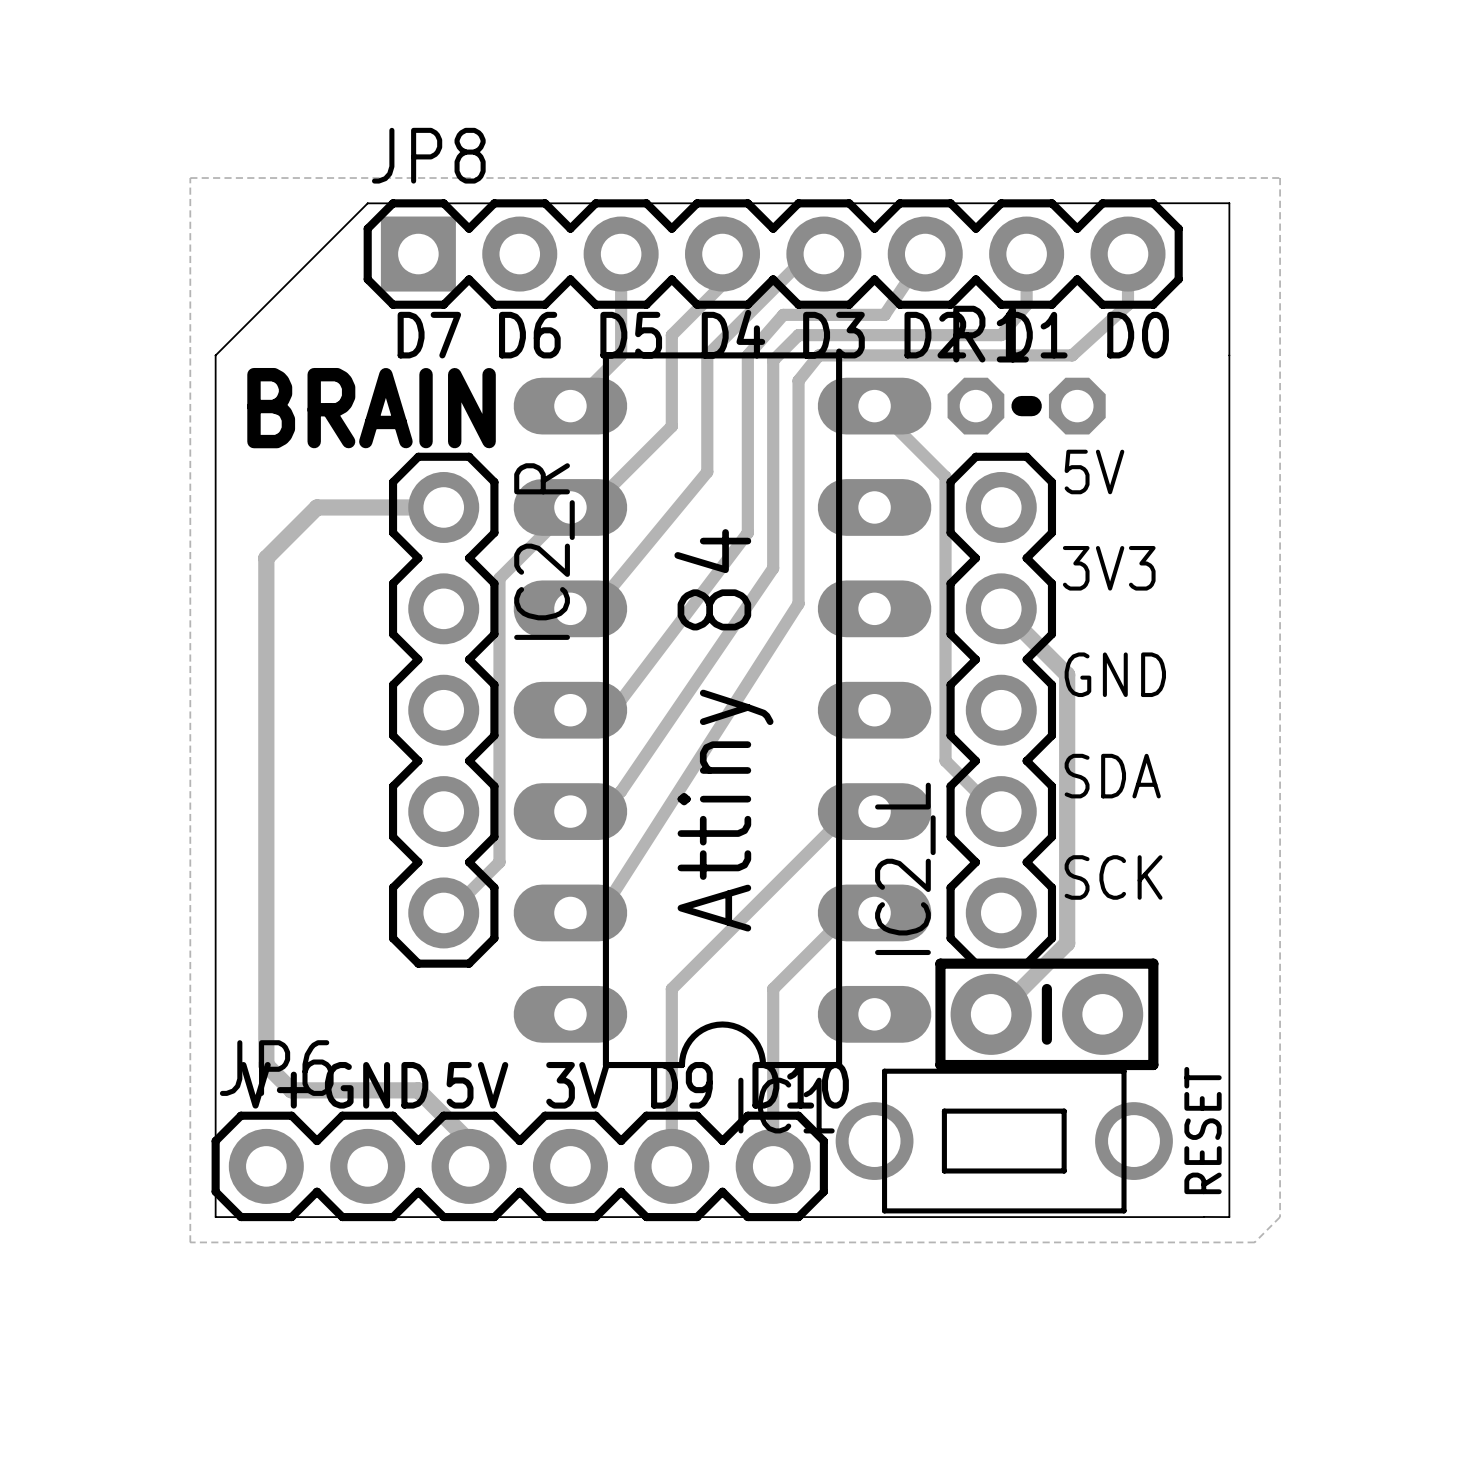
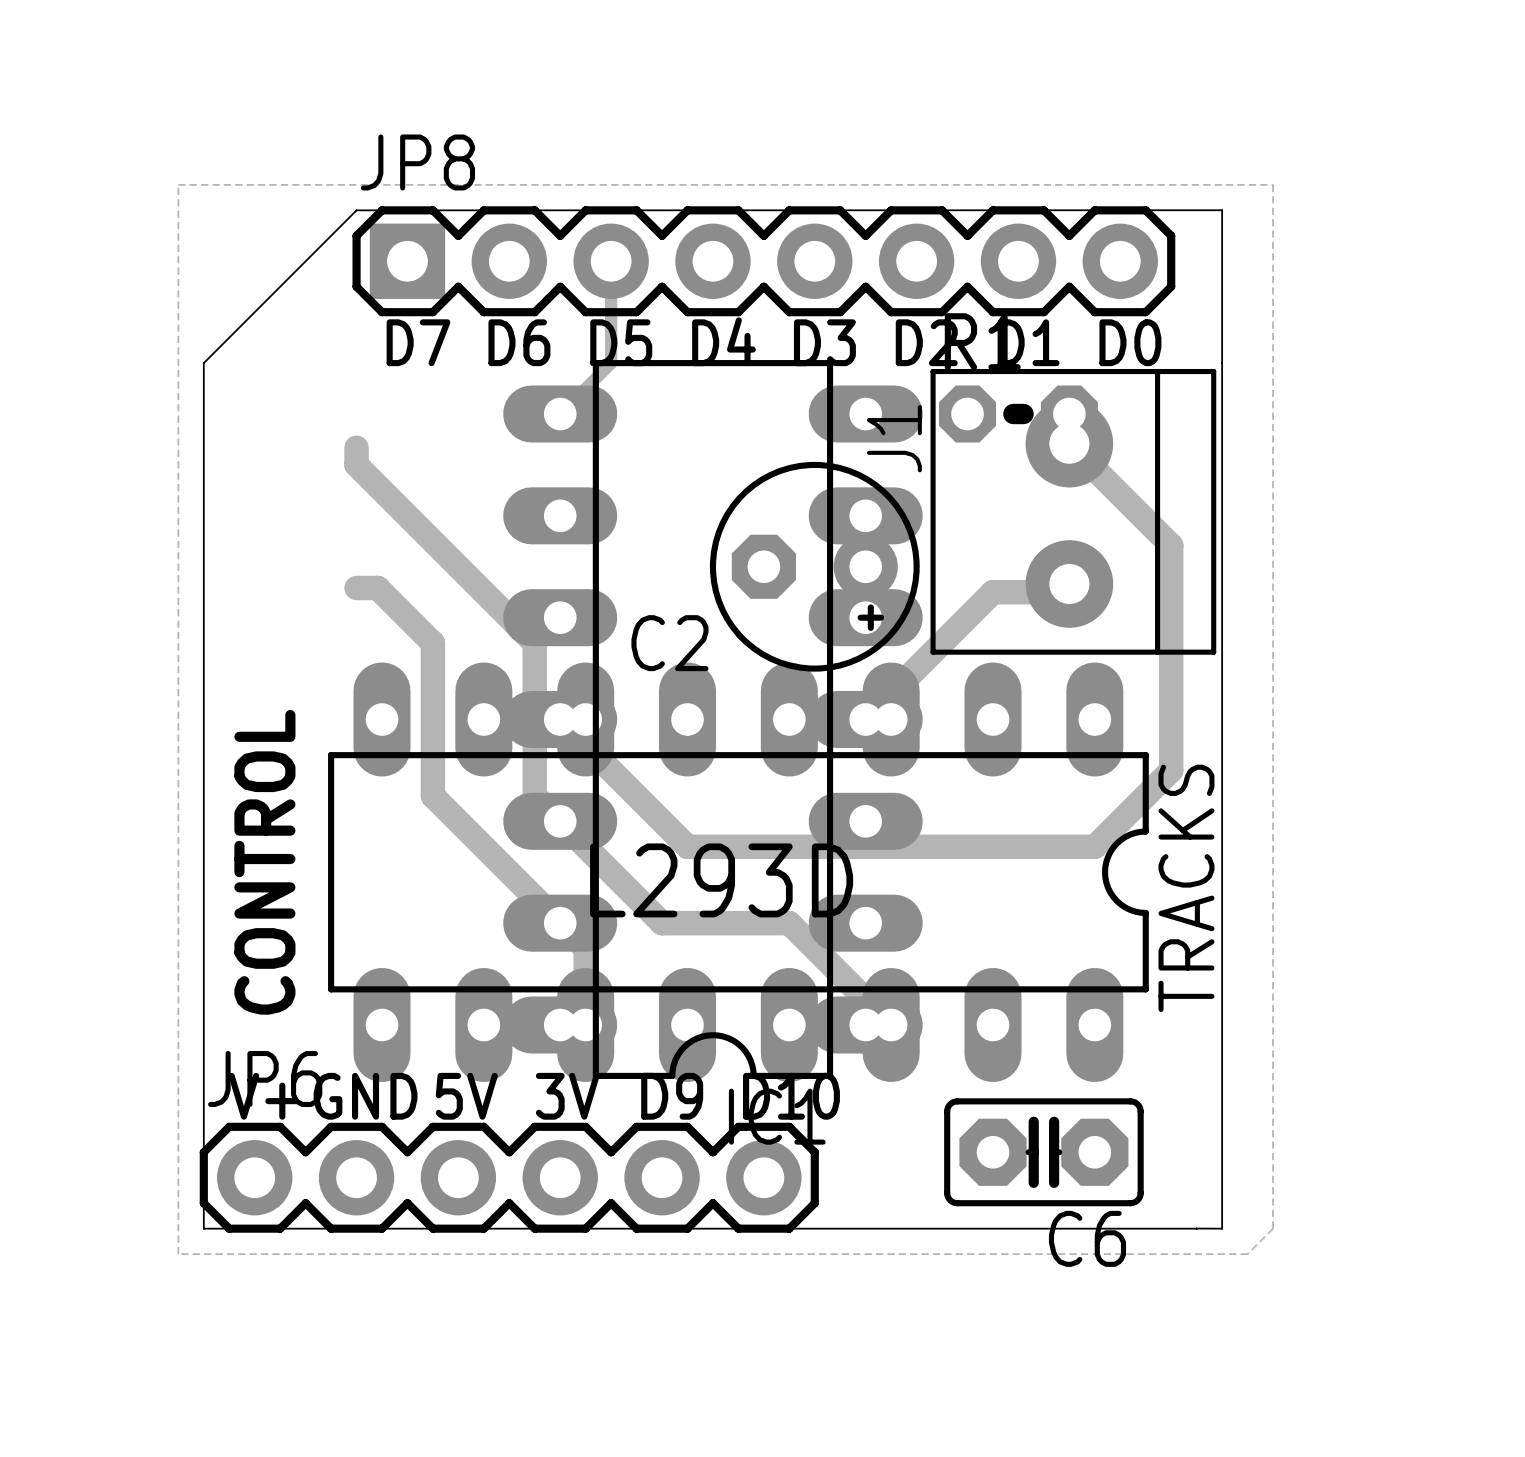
track: (722, 254) (722, 284) (671, 335) (671, 426) (590, 507) (570, 507) (499, 578) (499, 862) (448, 912) (443, 912) -> none
track: (823, 254) (808, 254) (707, 355) (707, 471) (611, 588) (590, 608) (570, 608) -> none
track: (925, 254) (884, 314) (783, 314) (747, 355) (747, 532) (621, 700) (611, 710) (570, 710) -> none
track: (1026, 254) (1026, 304) (1001, 335) (798, 335) (773, 360) (773, 568) (621, 791) (600, 811) (570, 811) -> none
track: (1128, 254) (1128, 304) (1072, 355) (818, 355) (798, 380) (798, 603) (600, 912) (570, 912) -> none
track: (874, 406) (945, 477) (945, 760) (996, 811) (1001, 811) -> none
text: BRAIN (371, 408) -> none
track: none -> (1069, 443) (1171, 545) (1171, 770) (1094, 846) (687, 846) (585, 744) (585, 719)
track: none -> (356, 447) (356, 464) (534, 643) (534, 795) (662, 923) (789, 923) (891, 1025)
text: 5V (1094, 471) -> none
J1: none -> (1073, 511)
track: (443, 507) (317, 507) (266, 558) (266, 1065) (291, 1090) (418, 1090) (469, 1141) (469, 1166) -> none
C2: none -> (814, 566)
text: 3V3 (1109, 568) -> none
track: none -> (1069, 584) (1061, 592) (993, 592) (891, 694) (891, 719)
track: none -> (356, 588) (377, 588) (432, 643) (432, 795) (585, 948) (585, 1025)
track: (1001, 608) (1067, 674) (1067, 943) (996, 1014) (991, 1014) -> none
text: GND (1115, 674) -> none
IC2_R: (443, 710) -> none
IC2_L: (1001, 710) -> none
text: Attiny 84 (723, 730) -> none
text: SDA (1112, 776) -> none
track: (874, 811) (849, 811) (671, 988) (671, 1166) -> none
text: none -> CONTROL (264, 862)
TRACKS: none -> (738, 872)
text: none -> L293D (721, 880)
text: SCK (1113, 877) -> none
track: (874, 912) (849, 912) (773, 988) (773, 1166) -> none
part: (1046, 1014) -> none
text: RESET (1203, 1130) -> none
part: (1004, 1141) -> none
C6: none -> (1043, 1152)

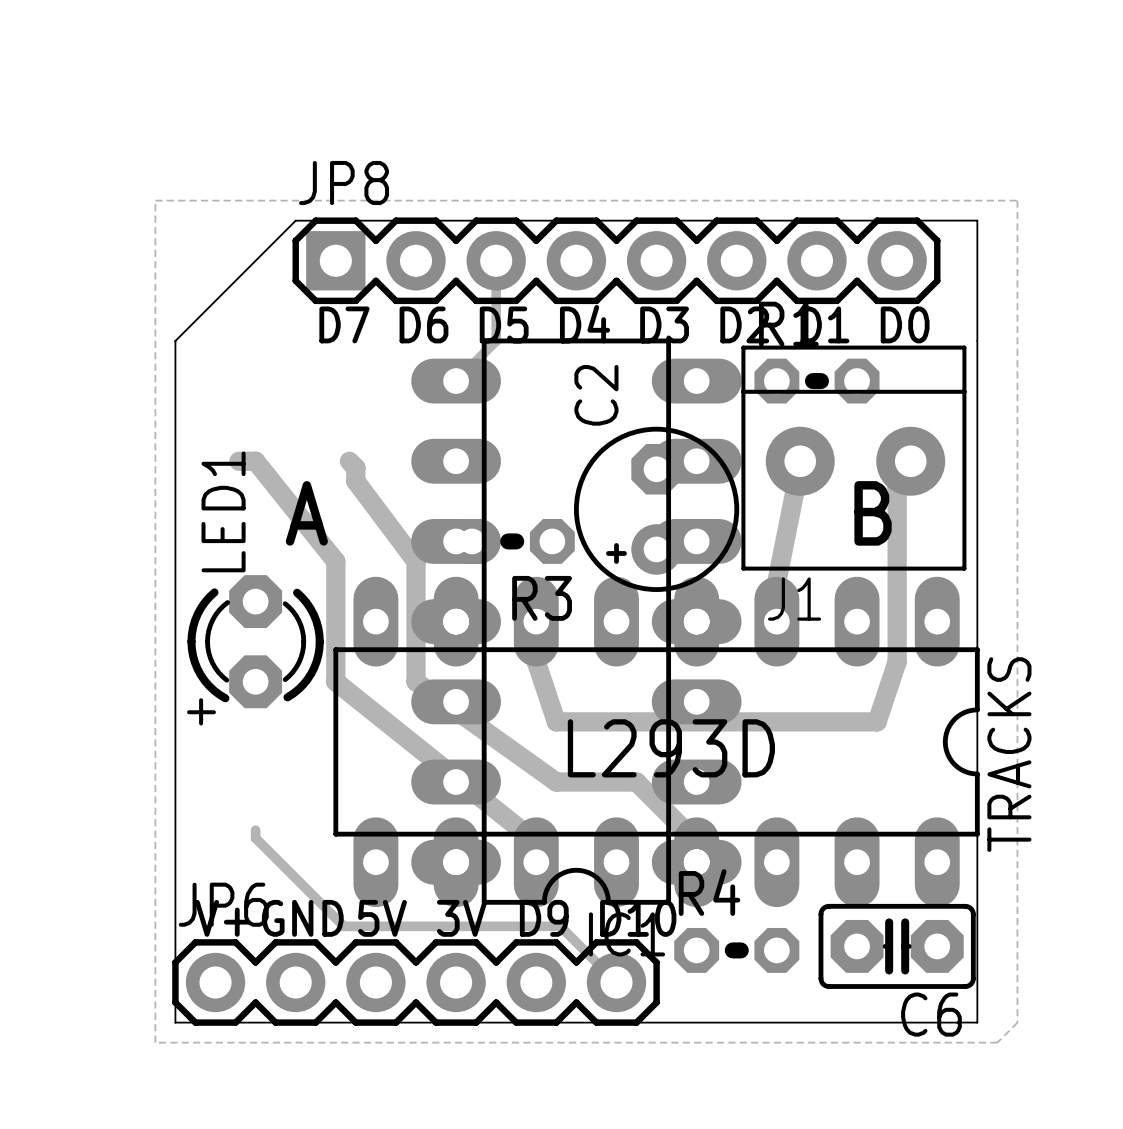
track: (1069, 443) (1171, 545) (1171, 770) (1094, 846) -> (910, 461) (897, 487) (897, 661) (877, 721)
track: (356, 447) (356, 464) (534, 643) (534, 795) (662, 923) (687, 923) -> (349, 461) (355, 467) (355, 481) (416, 561) (416, 681) (556, 782)
J1 rotation: 0° (1073, 511) -> 90° counterclockwise (853, 458)
track: none -> (238, 461) (255, 461) (335, 561) (335, 681) (536, 842) (536, 862)
track: none -> (800, 461) (796, 464) (796, 481) (776, 581) (776, 621)
C2 rotation: 0° (814, 566) -> 90° clockwise (656, 509)
text: none -> A (306, 513)
text: none -> B (873, 513)
track: (1069, 584) (1061, 592) (993, 592) (891, 694) (891, 719) -> none
track: (356, 588) (377, 588) (432, 643) (432, 795) (585, 948) (585, 1025) -> none
R3: none -> (512, 541)
track: (585, 719) (585, 744) (687, 846) -> (536, 621) (536, 661) (556, 721)
LED1: none -> (255, 650)
text: CONTROL (264, 862) -> none
TRACKS position: (738, 872) -> (656, 741)
text position: L293D (721, 880) -> L293D (671, 748)
track: none -> (255, 830) (255, 838) (343, 926) (560, 926) (616, 982)
R4: none -> (736, 950)
C6 position: (1043, 1152) -> (897, 946)

